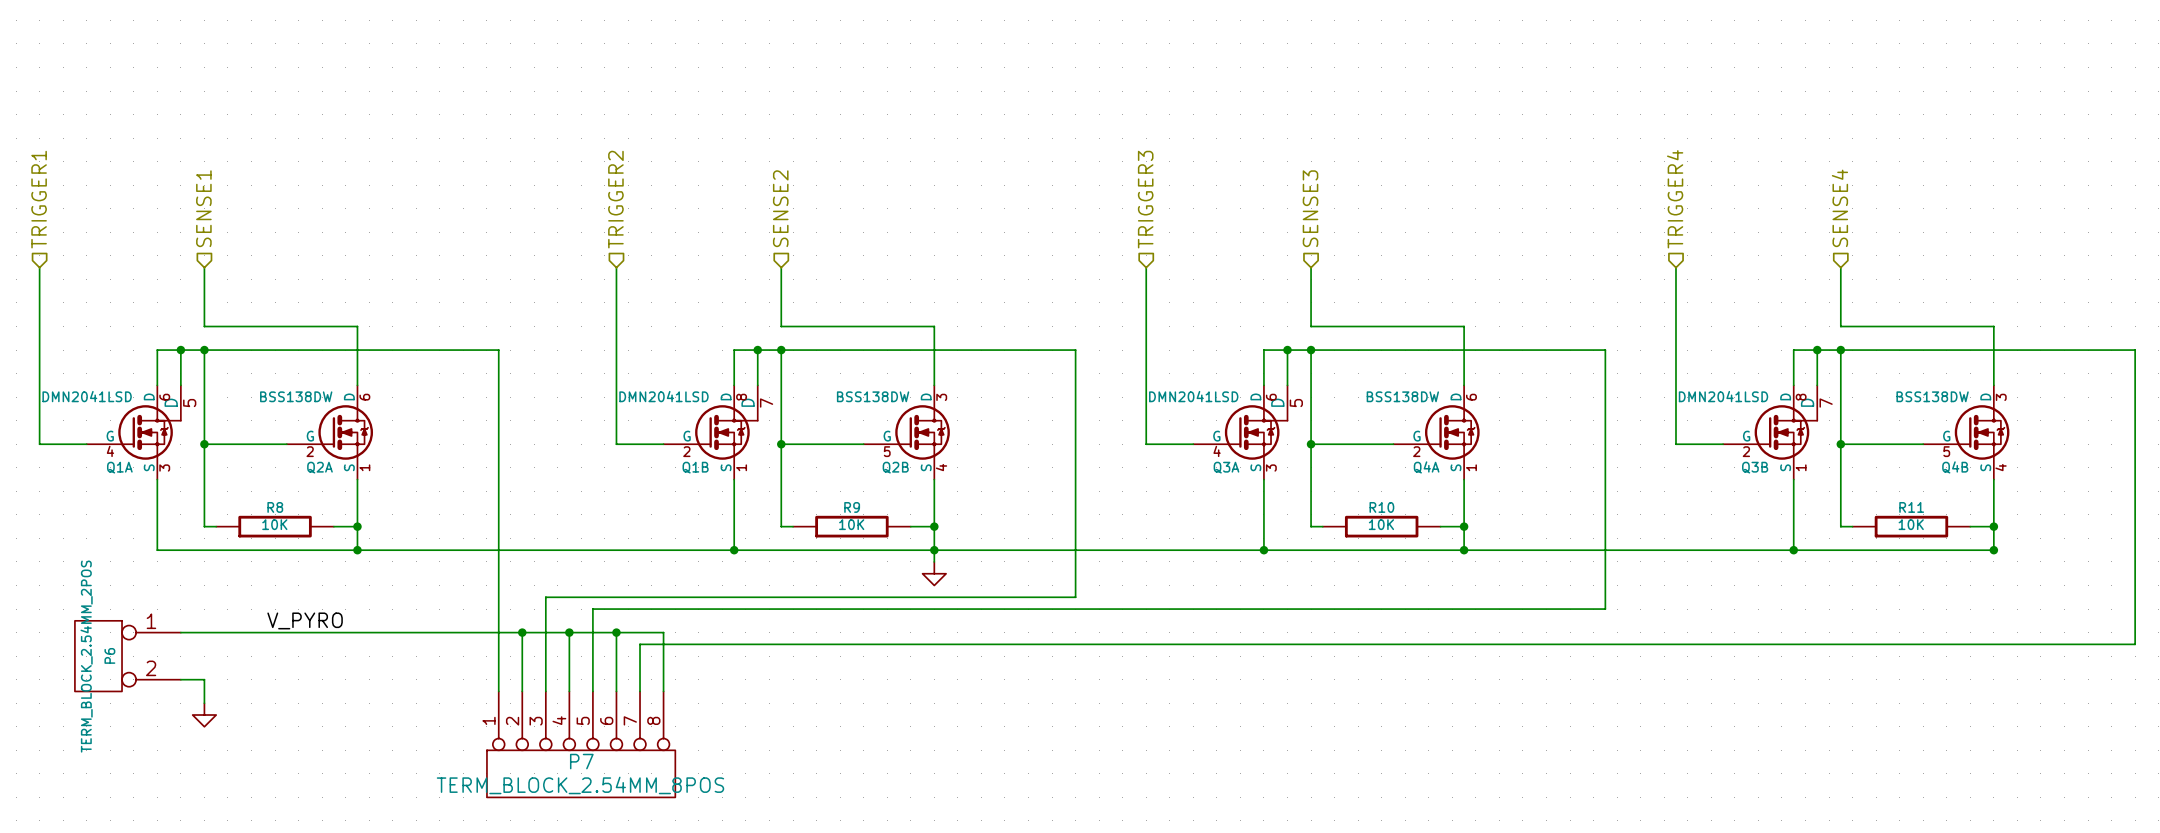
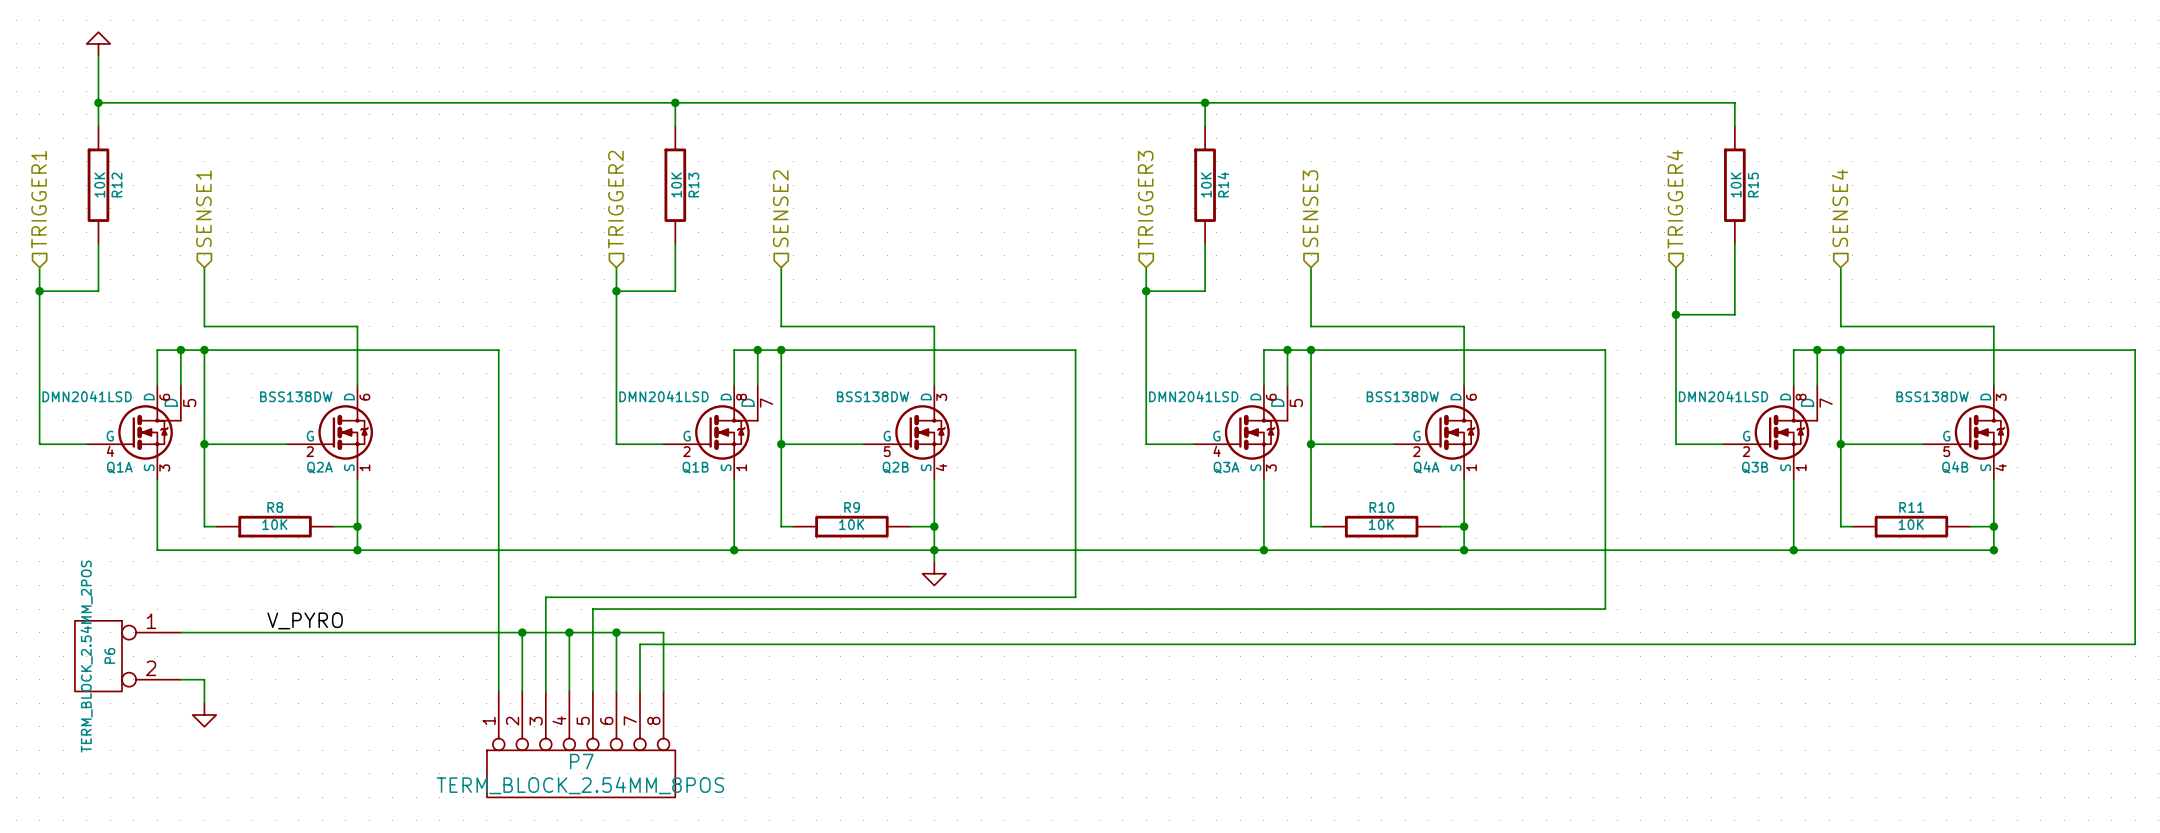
power symbol: none -> (98, 43)
wire: none -> (98, 55) (98, 126)
wire: none -> (98, 102) (1734, 102) (1734, 126)
junction: none -> (98, 102)
wire: none -> (675, 102) (675, 126)
junction: none -> (675, 102)
wire: none -> (1205, 102) (1205, 126)
junction: none -> (1205, 102)
R12: none -> 10K (98, 185)
R13: none -> 10K (675, 185)
R14: none -> 10K (1205, 185)
R15: none -> 10K (1734, 185)
wire: none -> (98, 244) (98, 291) (39, 291)
wire: none -> (675, 244) (675, 291) (616, 291)
wire: none -> (1205, 244) (1205, 291) (1146, 291)
wire: none -> (1734, 244) (1734, 314) (1675, 314)
junction: none -> (39, 291)
junction: none -> (616, 291)
junction: none -> (1146, 291)
junction: none -> (1675, 314)

